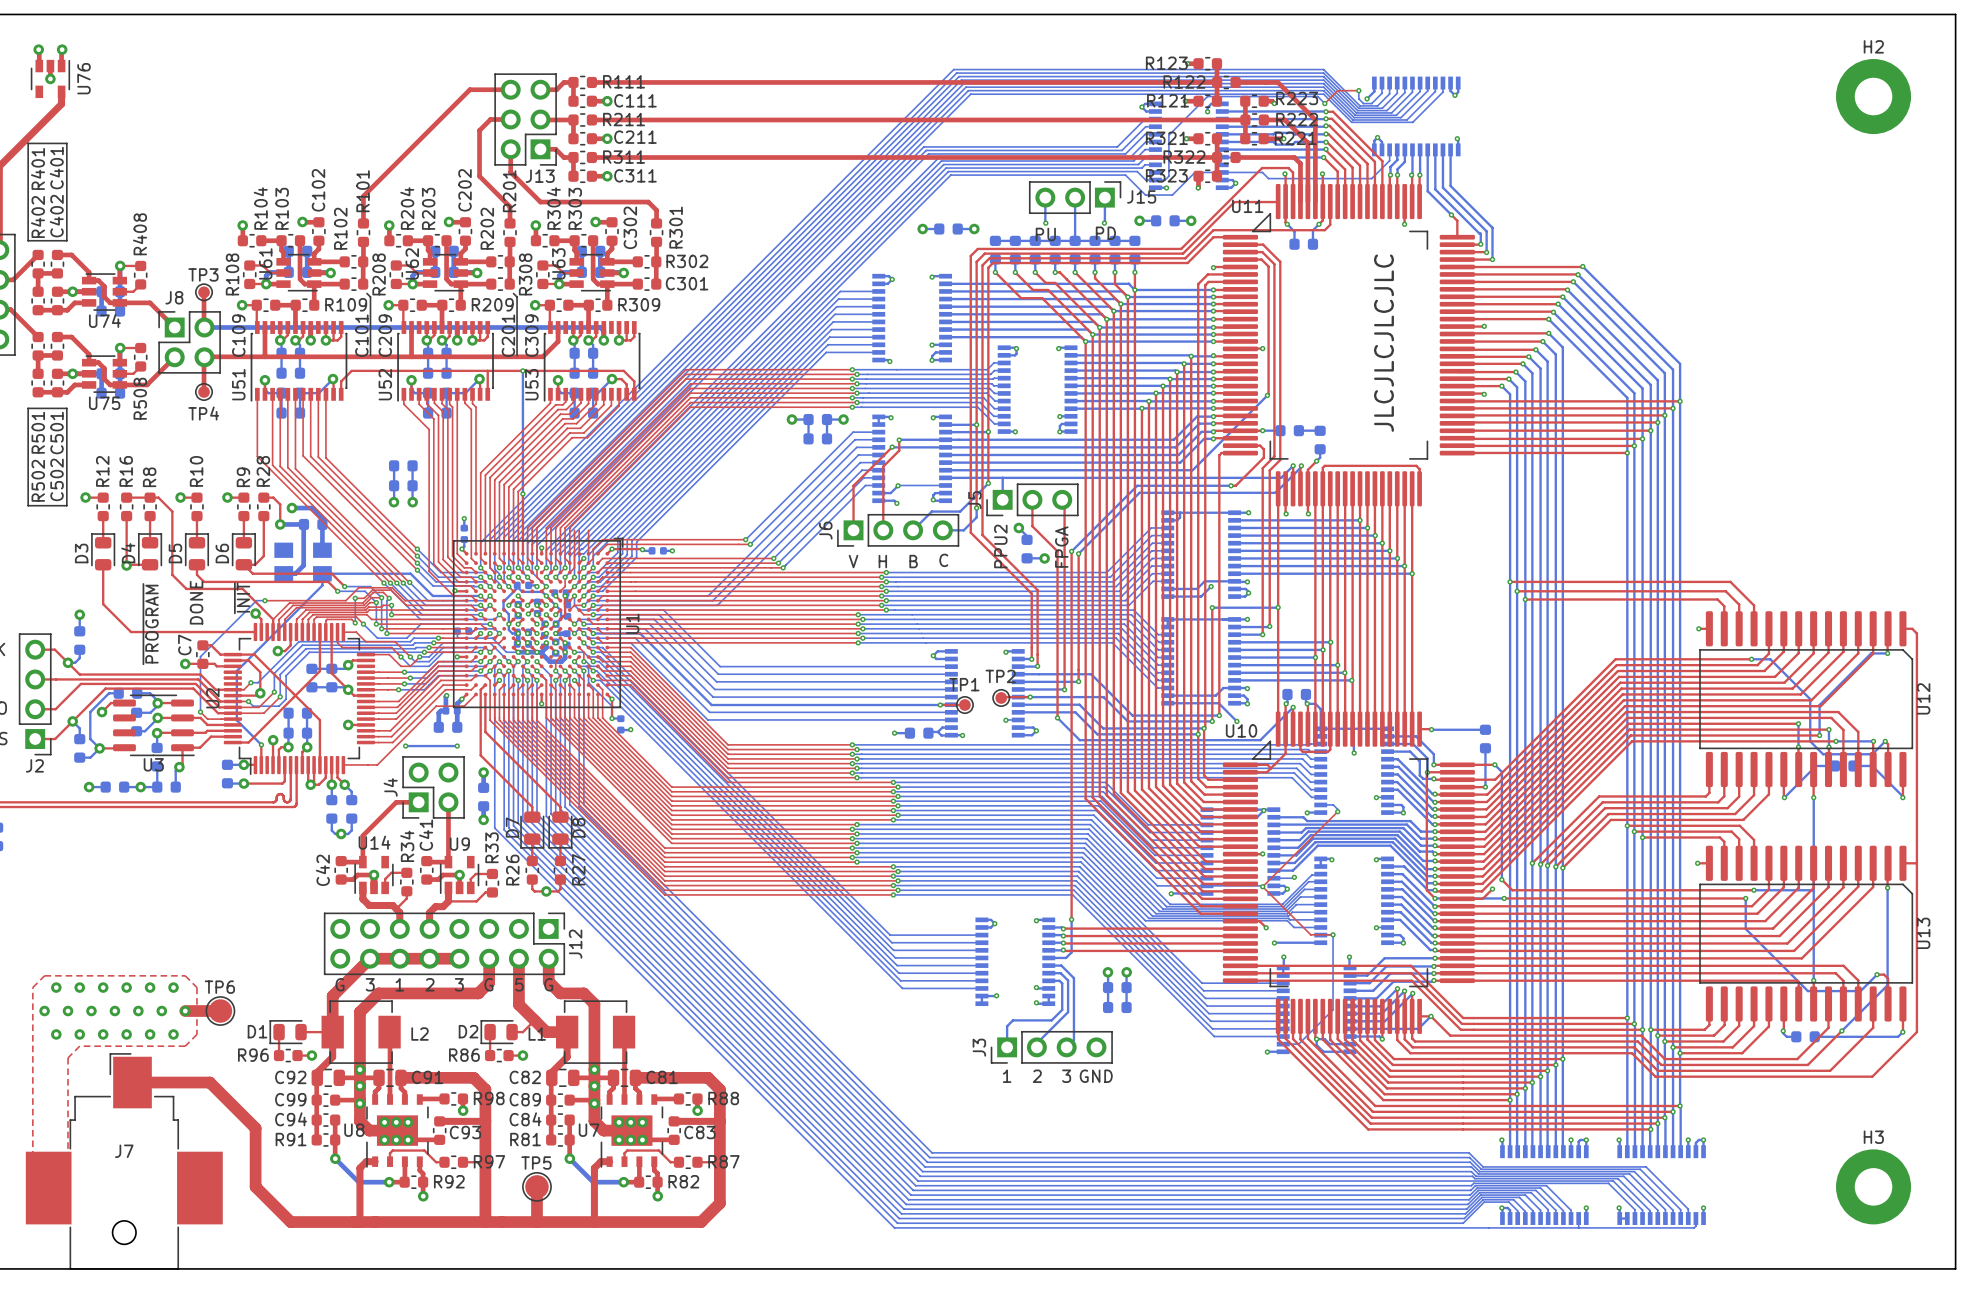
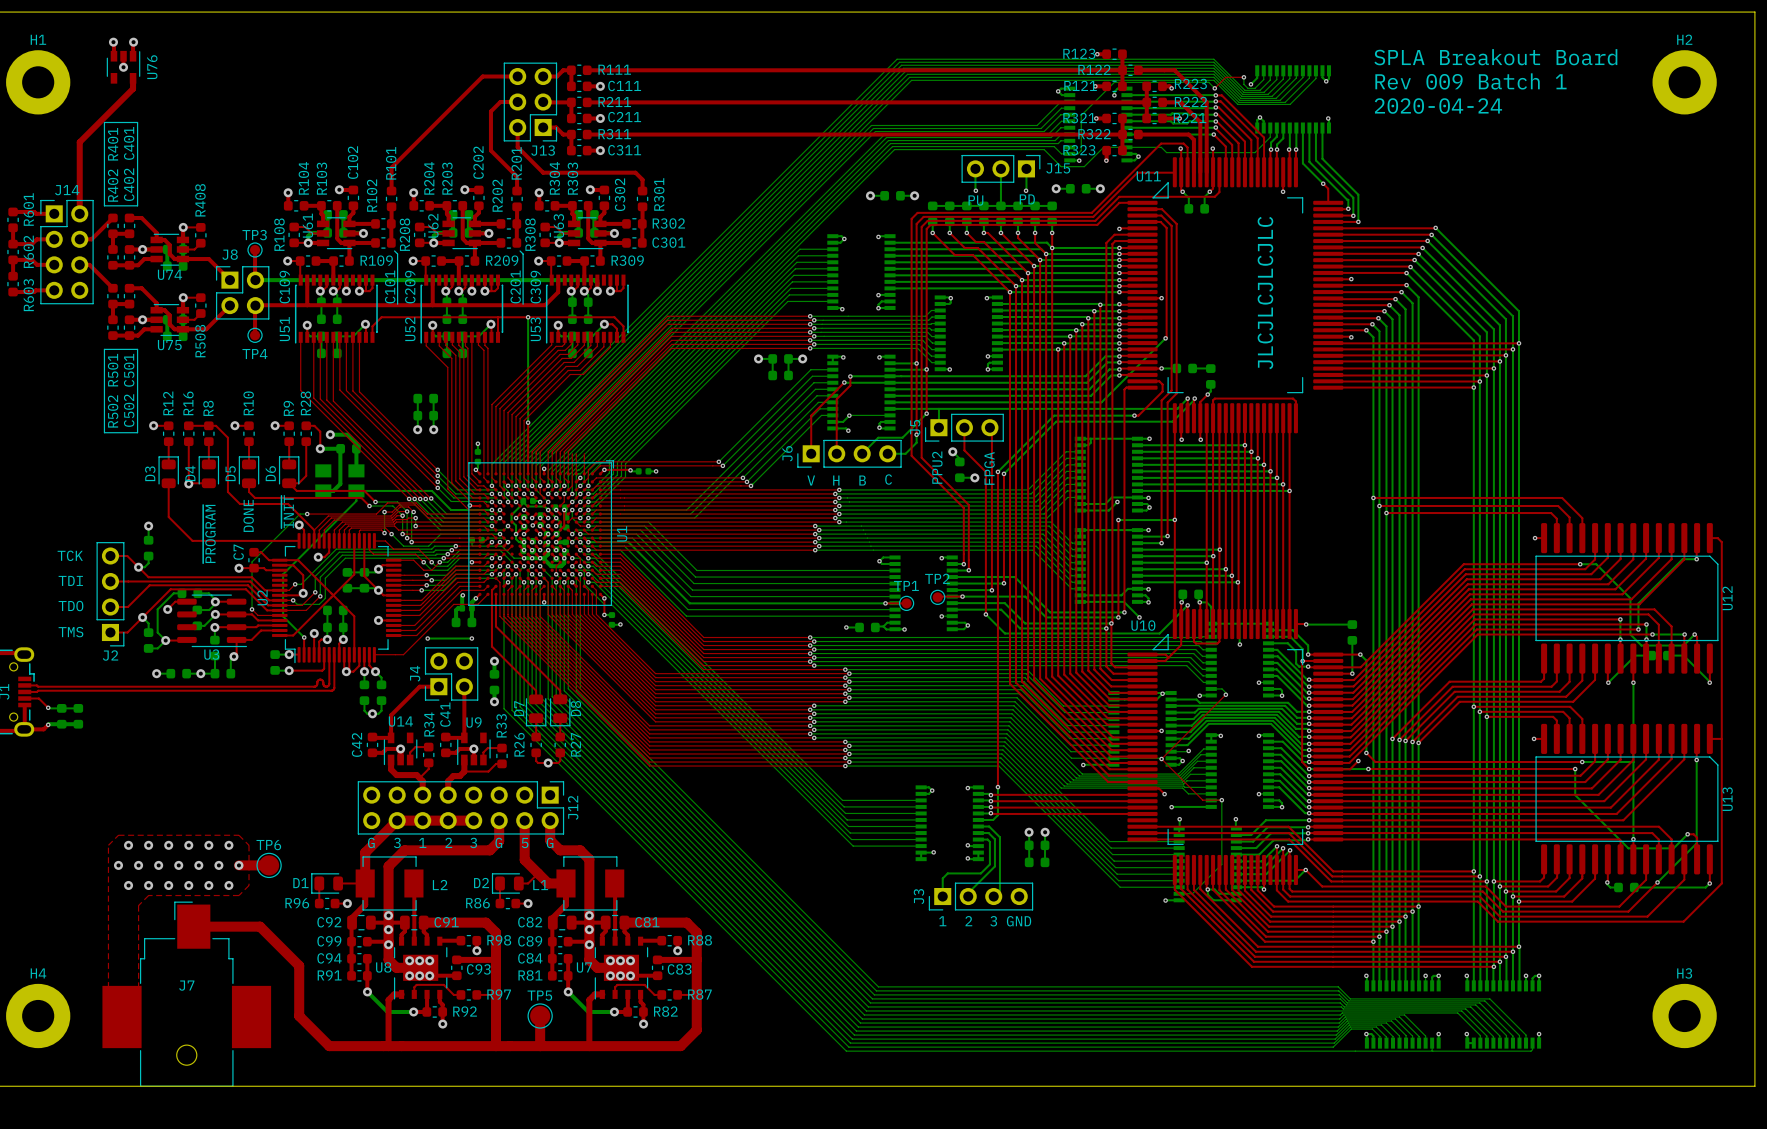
text: none -> SPLA Breakout Board (1495, 57)
text: none -> Rev 009 Batch 1 (1470, 81)
text: none -> 2020-04-24 (1438, 106)

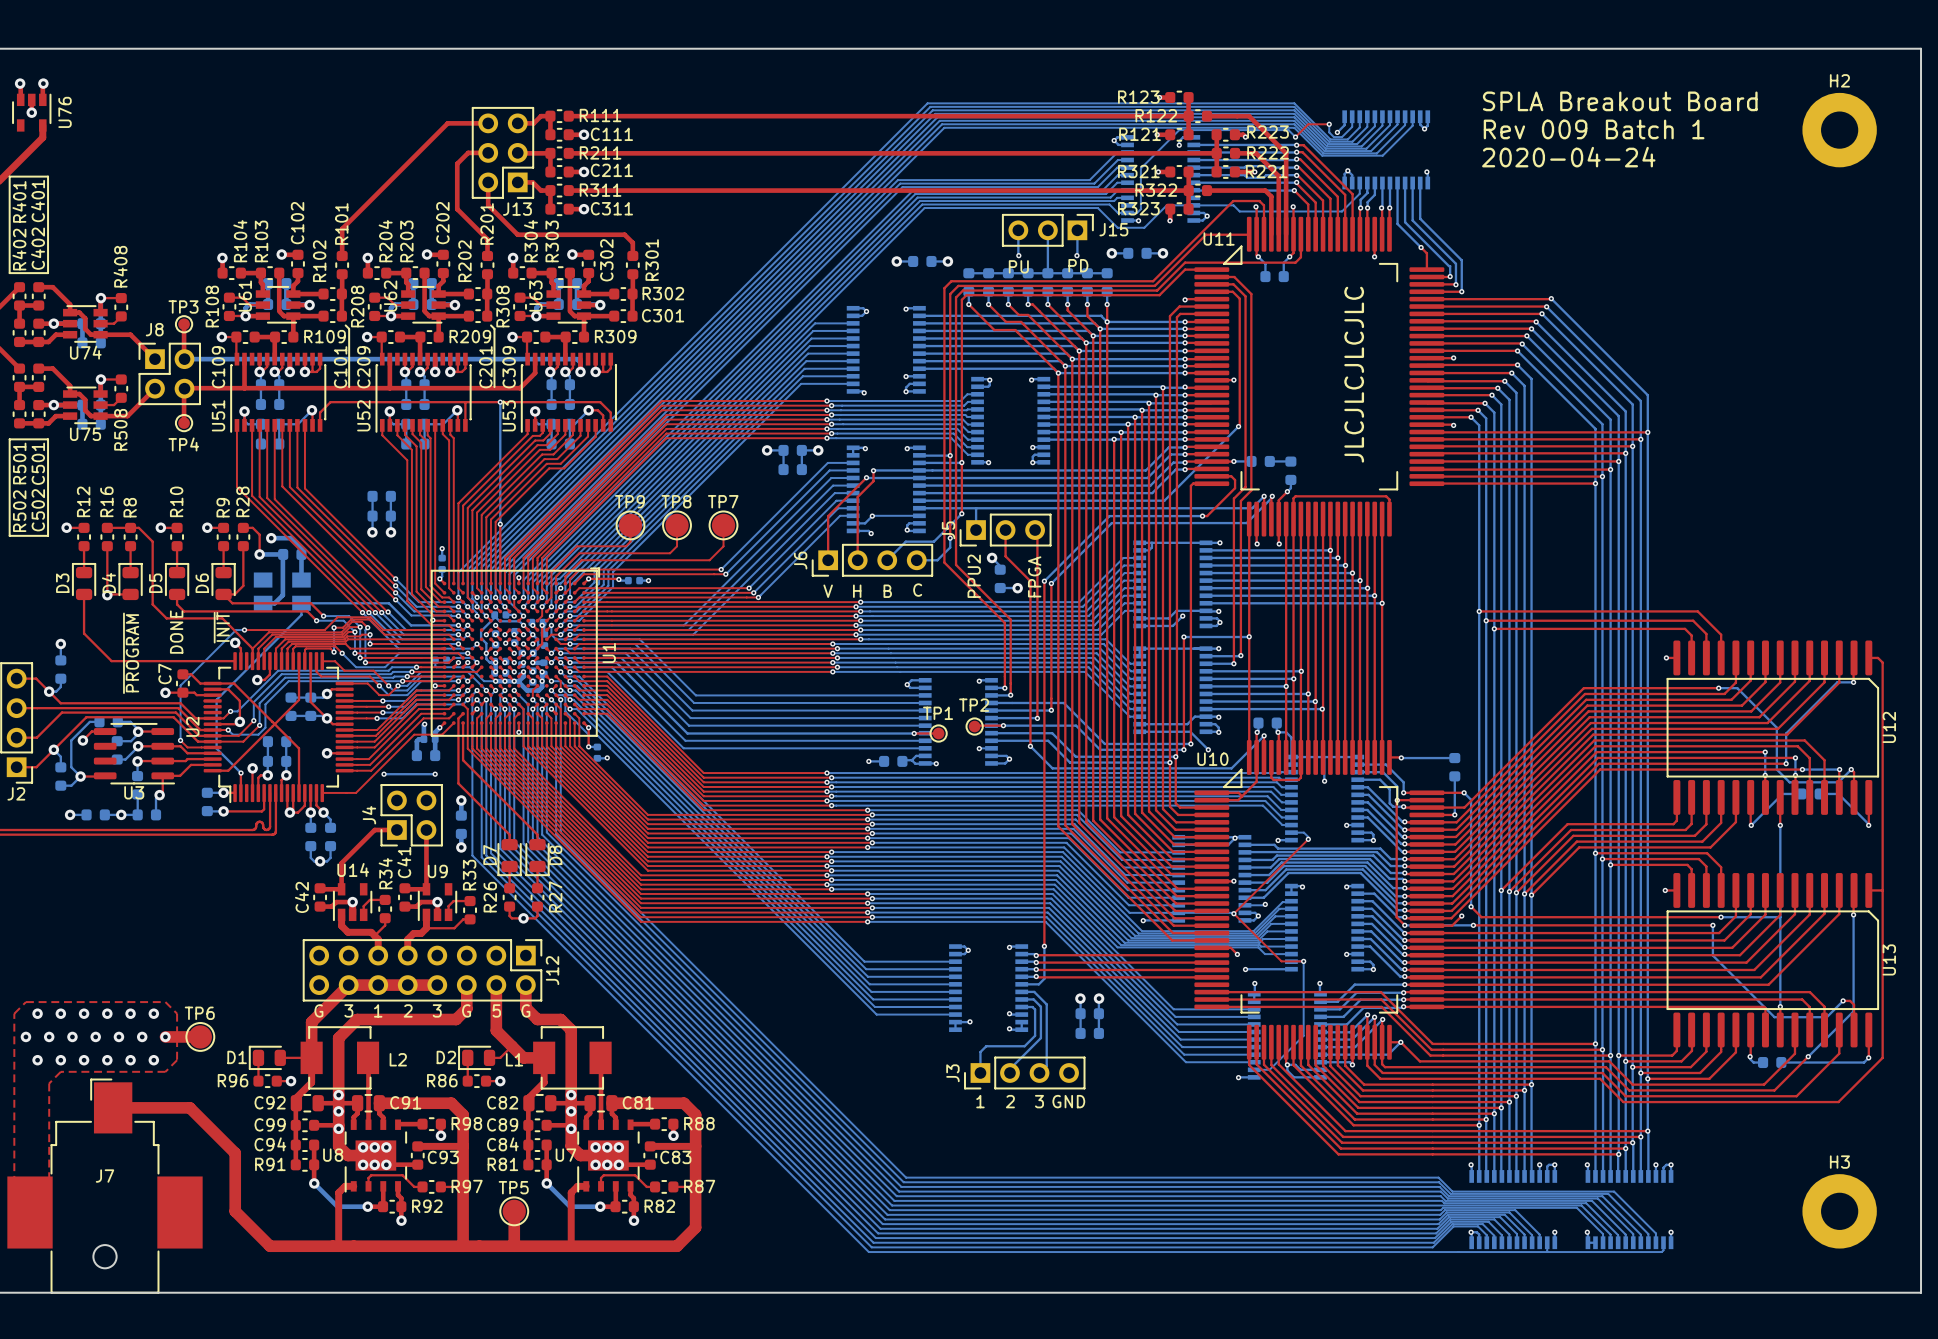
TP9: none -> (630, 525)
TP8: none -> (677, 525)
TP7: none -> (723, 525)
top track: (572, 453) (572, 463) -> (630, 525) (630, 541) (625, 546) (577, 546) (551, 571)
top track: (576, 453) (576, 467) -> (677, 525) (677, 546) (670, 553) (579, 553) (556, 576)
top track: (584, 453) (584, 467) -> (723, 525) (723, 546) (709, 560) (581, 560) (565, 576)

